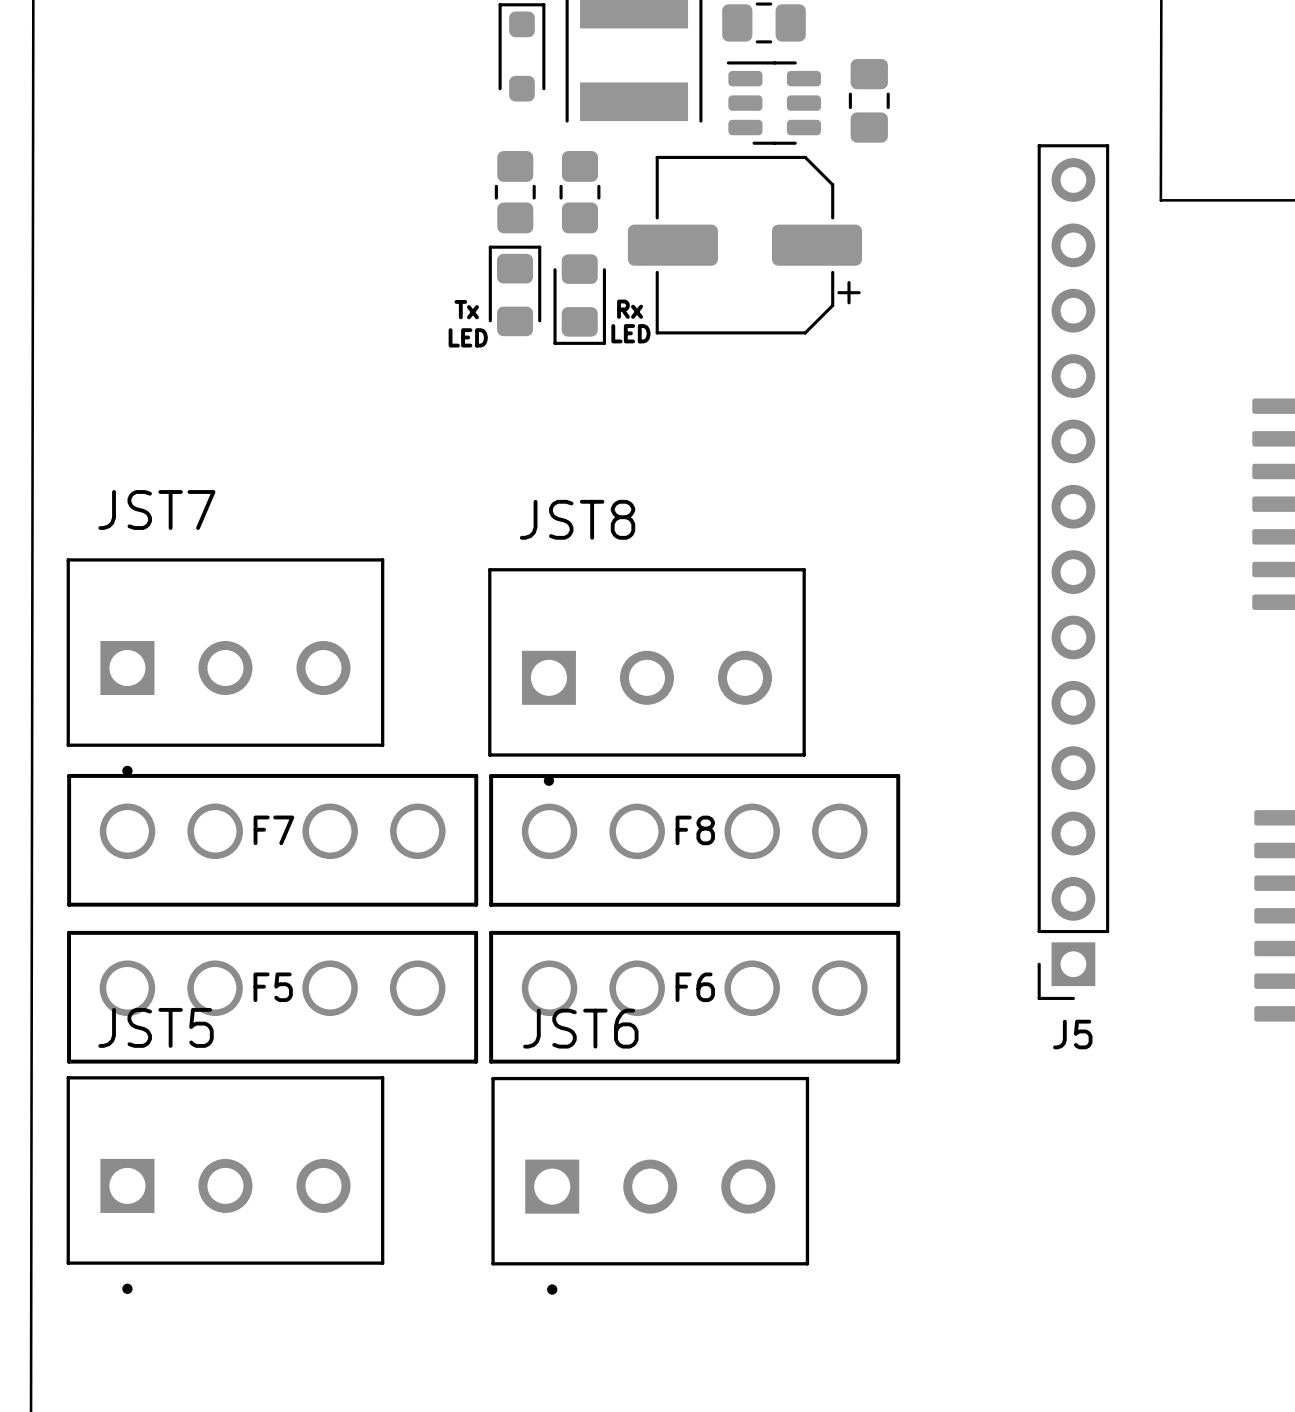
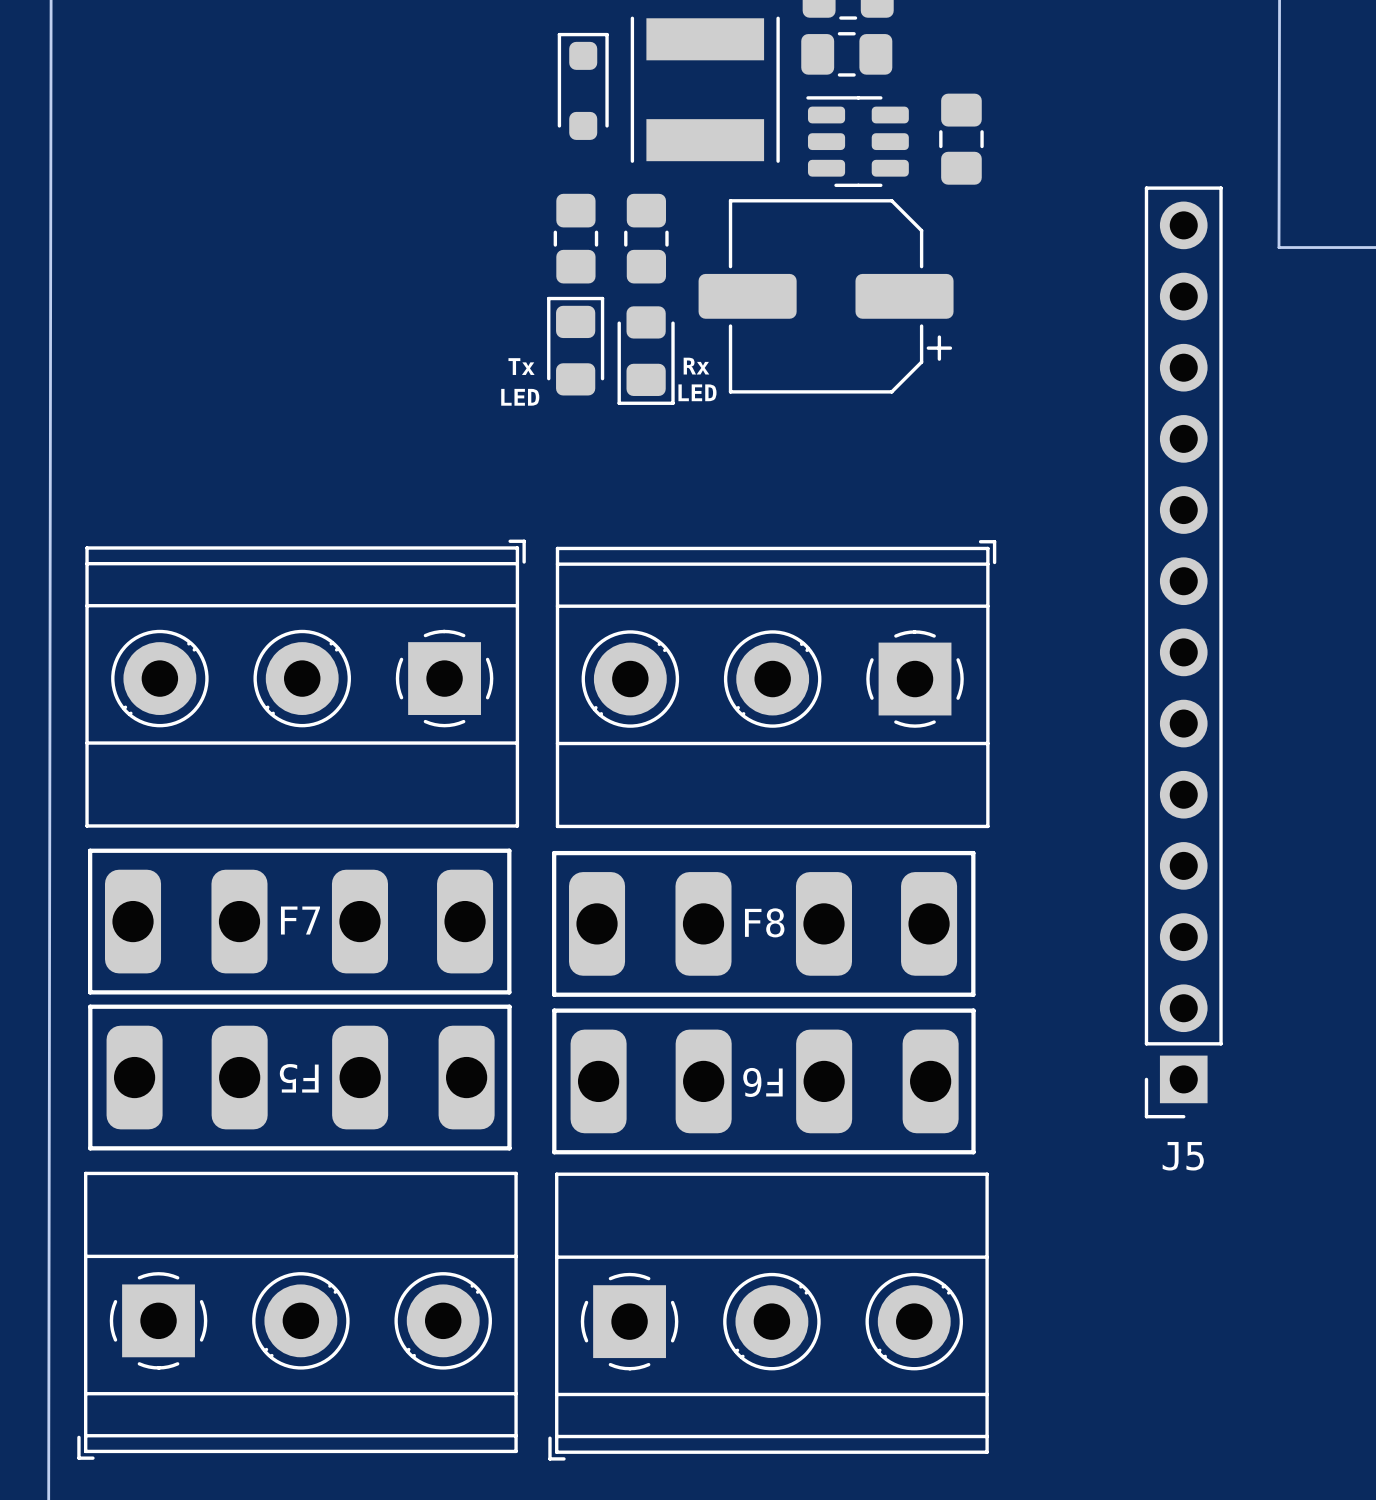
part: none -> (305, 683)
part: none -> (776, 684)
JST7: (225, 667) -> none
JST8: (646, 676) -> none
F7 footprint: [67, 773, 479, 907] -> [88, 848, 512, 995]
F8 footprint: [489, 774, 901, 907] -> [552, 850, 976, 997]
F5 footprint: [67, 930, 479, 1064] -> [88, 1004, 512, 1151]
F6 footprint: [489, 930, 901, 1064] -> [552, 1008, 976, 1155]
part: none -> (297, 1315)
part: none -> (768, 1316)
JST5: (225, 1185) -> none
JST6: (650, 1185) -> none

